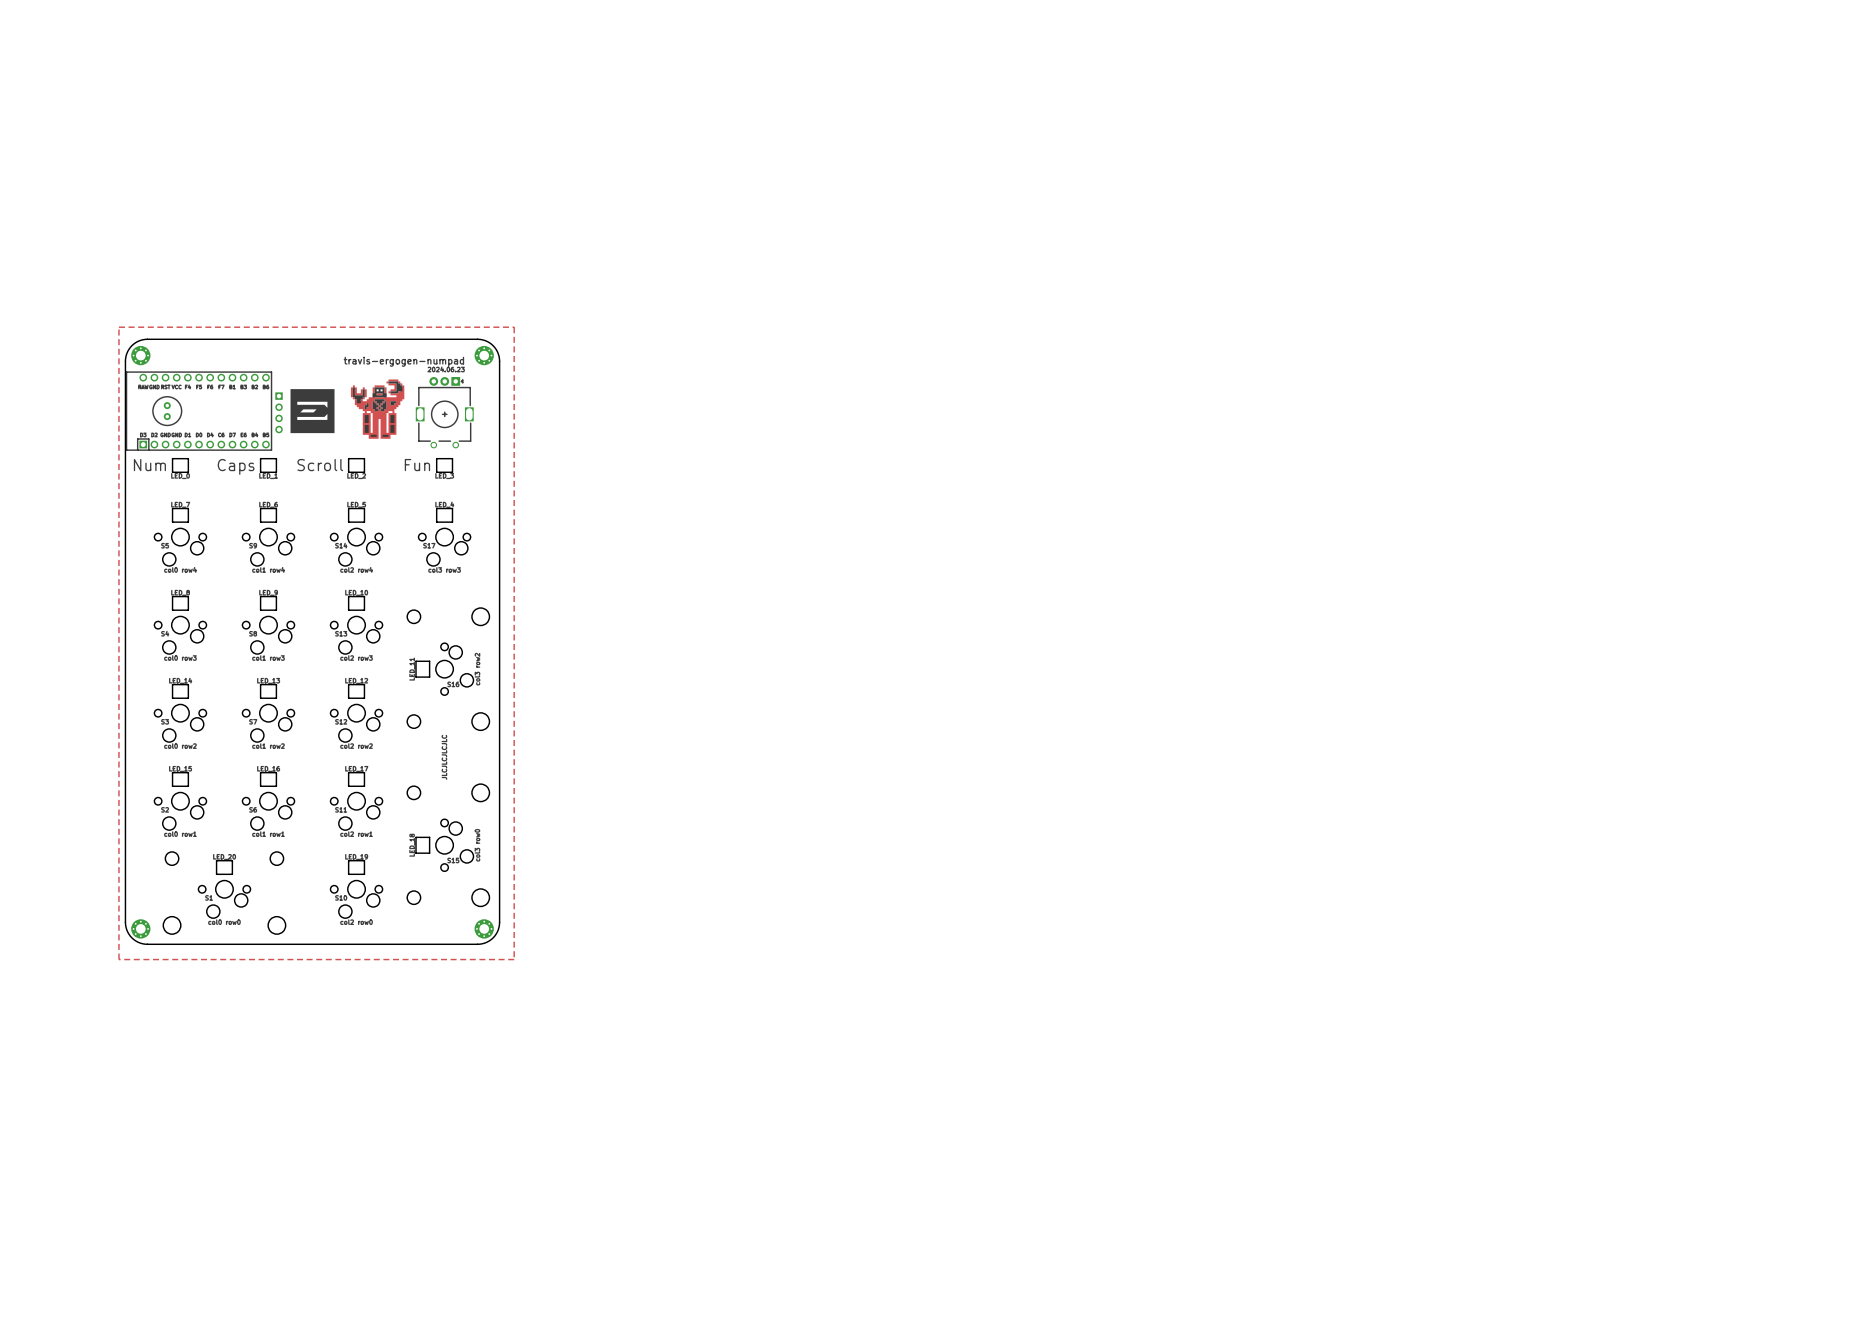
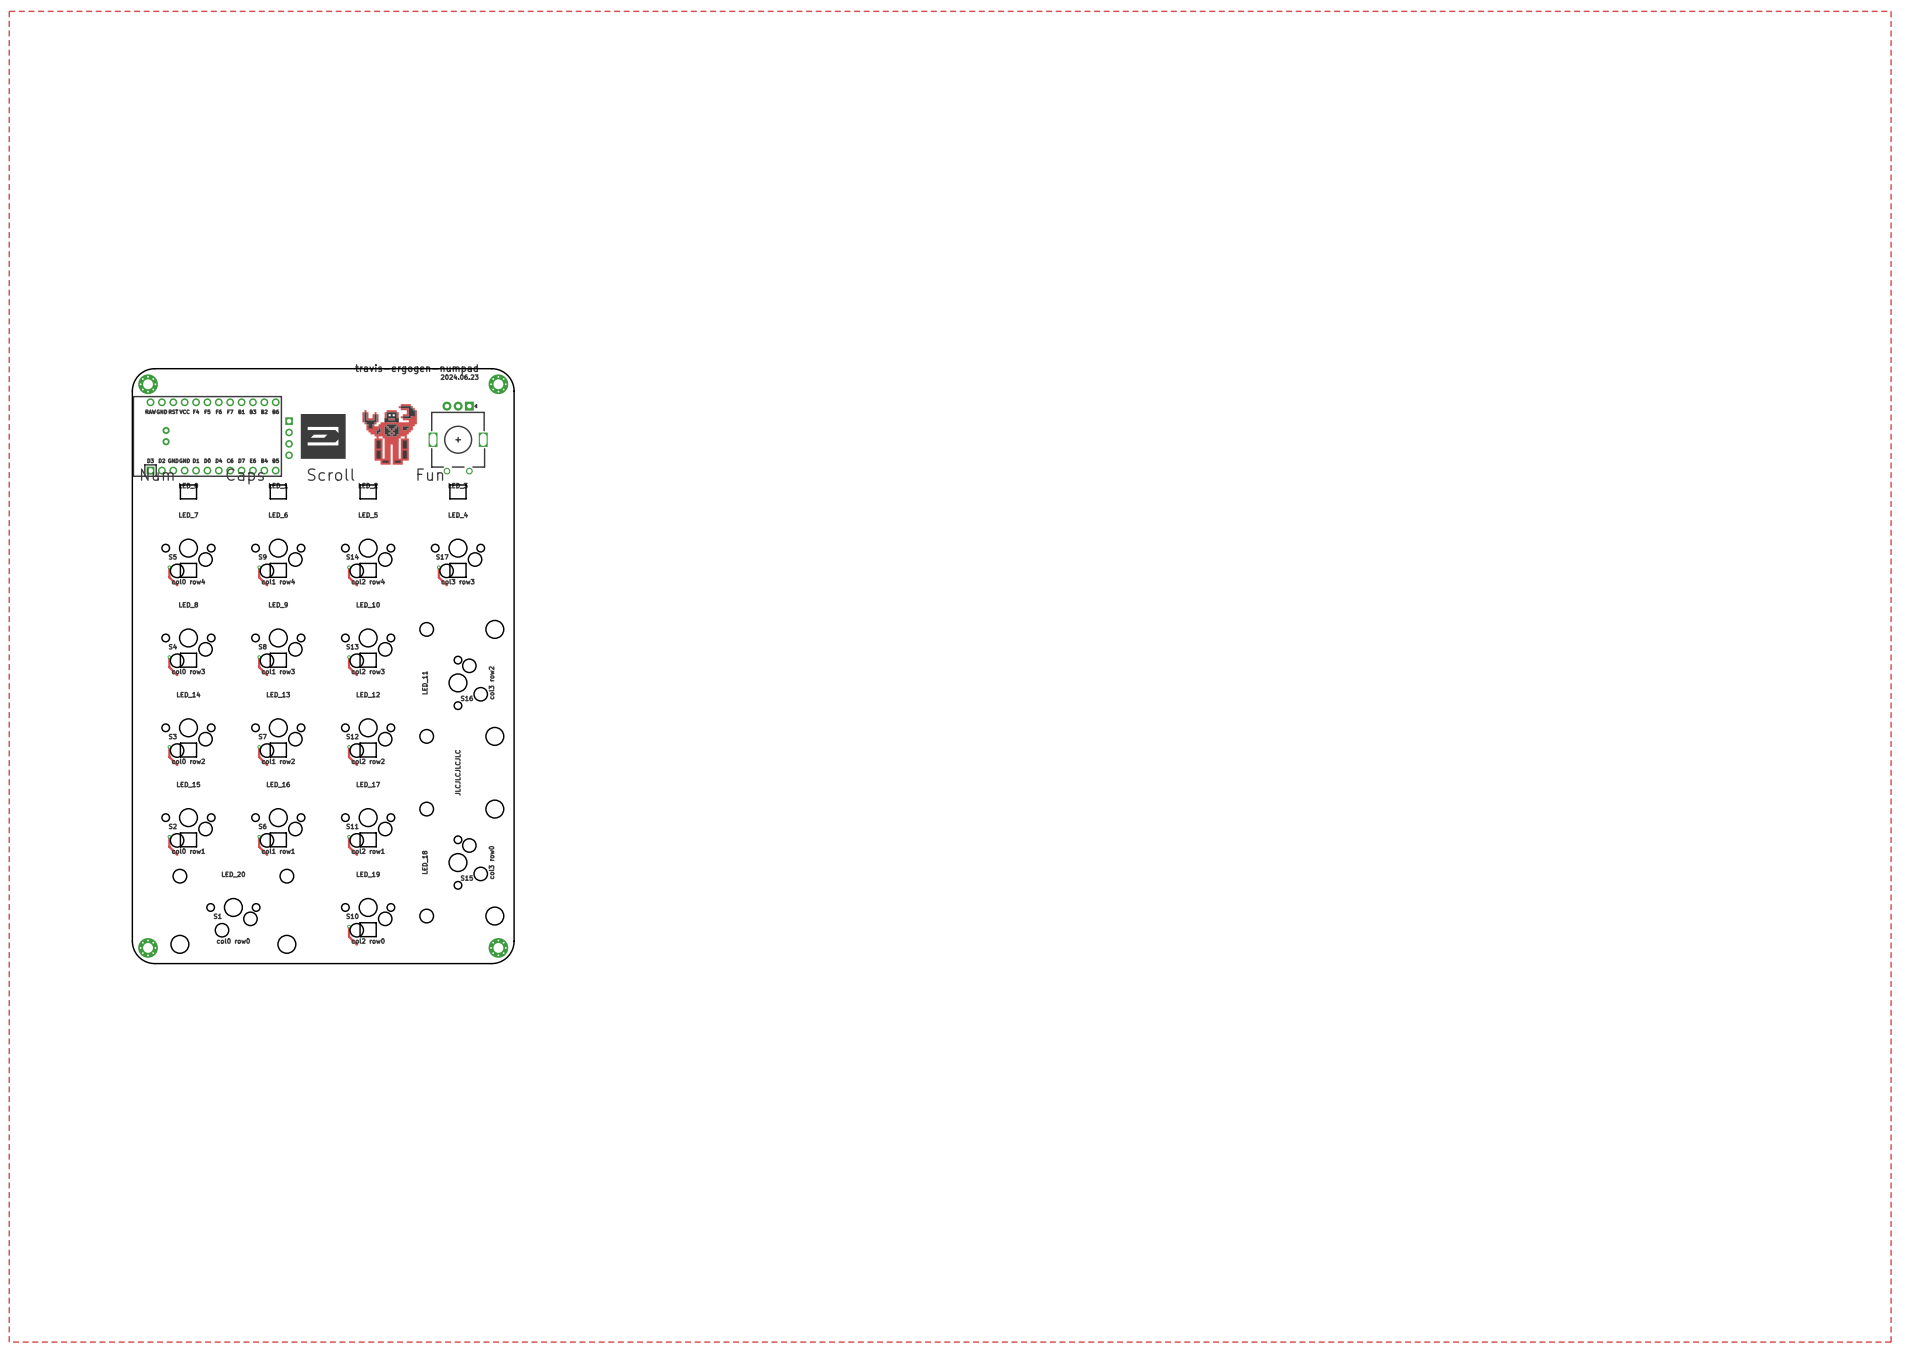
zone outline: none -> (9, 11) (1891, 11) (1891, 1342) (9, 1342) (9, 11)
zone outline: (118, 327) (514, 327) (514, 959) (118, 959) (118, 327) -> none
part position: (140, 355) -> (148, 384)
part position: (484, 355) -> (498, 384)
board edge: (125, 383) (125, 358) (127, 351) (135, 342) (147, 339) (480, 339) (491, 344) (497, 351) (499, 358) (499, 383) -> (132, 391) (134, 381) (138, 375) (147, 369) (154, 368) (494, 368) (507, 375) (512, 383) (514, 391)
drawing: [290, 389, 335, 434] -> none
drawing: none -> [300, 413, 346, 459]
drawing position: (377, 409) -> (389, 434)
part: (167, 411) -> none
part position: (199, 411) -> (207, 436)
part position: (279, 412) -> (289, 438)
part position: (444, 412) -> (458, 438)
part: none -> (166, 436)
part position: (180, 465) -> (188, 491)
part position: (268, 465) -> (278, 491)
part position: (356, 465) -> (368, 491)
part position: (444, 465) -> (457, 491)
part: (180, 515) -> none
part: (268, 515) -> none
part: (356, 515) -> none
part: (444, 515) -> none
track: none -> (169, 567) (169, 577) (177, 585)
via: none -> (169, 567)
track: none -> (259, 567) (259, 577) (267, 585)
via: none -> (259, 567)
track: none -> (349, 567) (349, 577) (356, 585)
via: none -> (349, 567)
track: none -> (438, 567) (438, 577) (446, 585)
via: none -> (438, 567)
part: none -> (188, 570)
part: none -> (278, 570)
part: none -> (368, 570)
part: none -> (457, 570)
part: (180, 603) -> none
part: (268, 603) -> none
part: (356, 603) -> none
track: none -> (169, 657) (169, 667) (177, 675)
via: none -> (169, 657)
track: none -> (259, 657) (259, 667) (267, 675)
via: none -> (259, 657)
track: none -> (349, 657) (349, 667) (356, 675)
via: none -> (349, 657)
part: none -> (188, 660)
part: none -> (278, 660)
part: none -> (368, 660)
part: (422, 669) -> none
part: (180, 691) -> none
part: (268, 691) -> none
part: (356, 691) -> none
track: none -> (169, 746) (169, 757) (177, 764)
via: none -> (169, 746)
track: none -> (259, 746) (259, 757) (267, 764)
via: none -> (259, 746)
track: none -> (349, 746) (349, 757) (356, 764)
via: none -> (349, 746)
part: none -> (188, 750)
part: none -> (278, 750)
part: none -> (368, 750)
part: (180, 779) -> none
part: (268, 779) -> none
part: (356, 779) -> none
track: none -> (169, 836) (169, 846) (177, 854)
via: none -> (169, 836)
track: none -> (259, 836) (259, 846) (267, 854)
via: none -> (259, 836)
track: none -> (349, 836) (349, 846) (356, 854)
via: none -> (349, 836)
part: none -> (188, 839)
part: none -> (278, 839)
part: none -> (368, 839)
part: (422, 845) -> none
part: (224, 867) -> none
part: (356, 867) -> none
track: none -> (349, 926) (349, 936) (356, 944)
via: none -> (349, 926)
part: none -> (368, 929)

